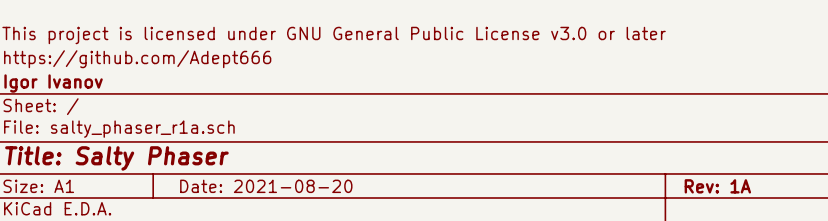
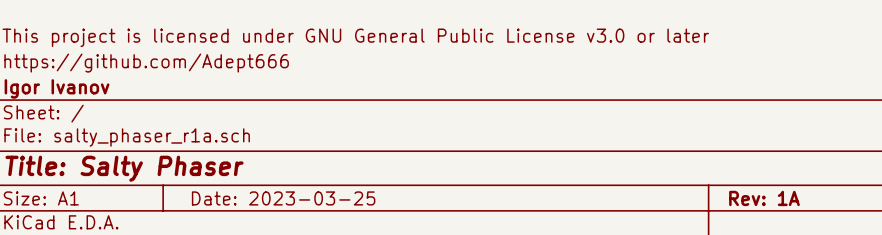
title block: Date: 2021-08-20 (266, 186) -> Date: 2023-03-25 (283, 198)

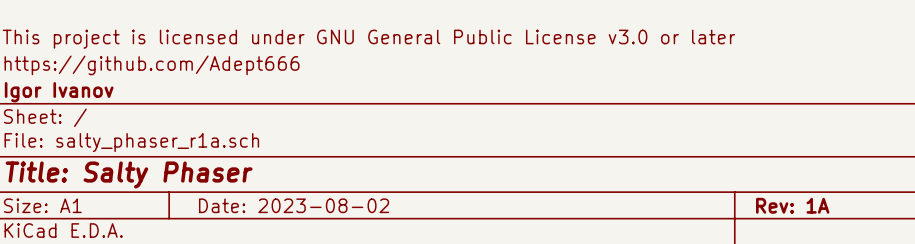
title block: Date: 2023-03-25 (283, 198) -> Date: 2023-08-02 (294, 205)

